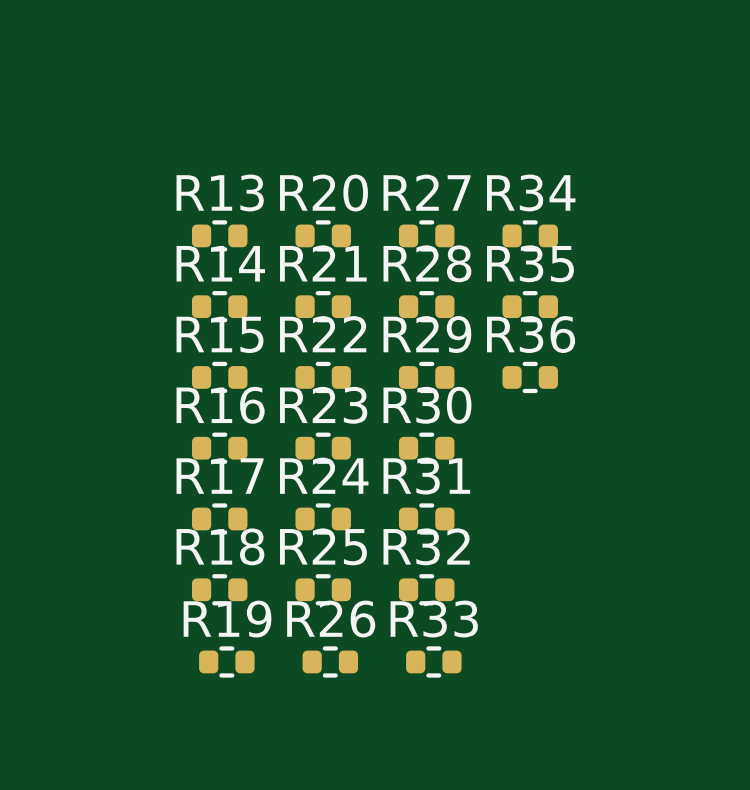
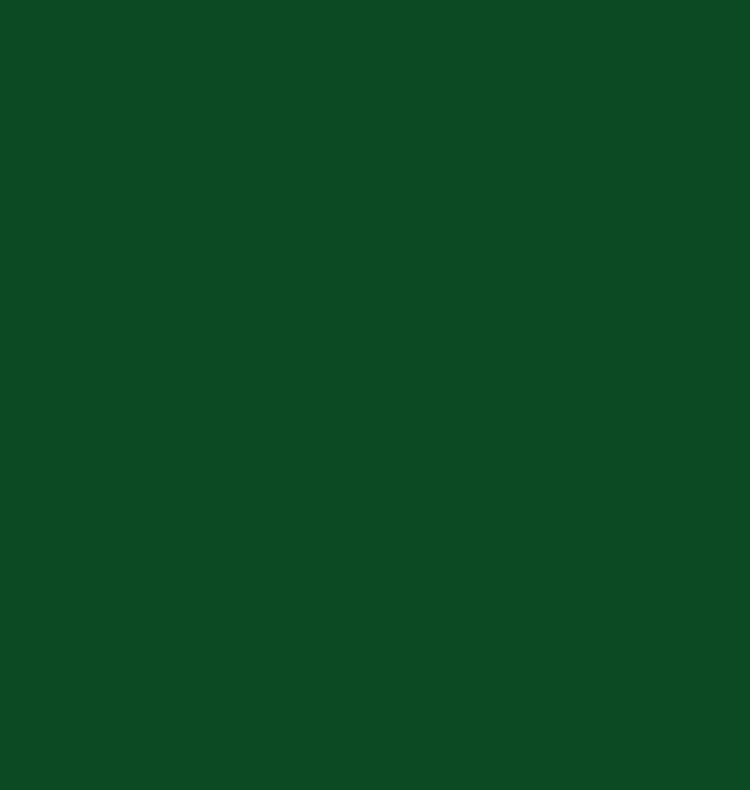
R13: (219, 235) -> none
R20: (323, 235) -> none
R27: (426, 235) -> none
R34: (530, 235) -> none
R14: (219, 306) -> none
R21: (323, 306) -> none
R28: (426, 306) -> none
R35: (530, 306) -> none
R15: (219, 377) -> none
R22: (323, 377) -> none
R29: (426, 377) -> none
R36: (530, 377) -> none
R16: (219, 448) -> none
R23: (323, 448) -> none
R30: (426, 448) -> none
R17: (219, 519) -> none
R24: (323, 519) -> none
R31: (426, 519) -> none
R18: (219, 589) -> none
R25: (323, 589) -> none
R32: (426, 589) -> none
R19: (226, 661) -> none
R26: (330, 661) -> none
R33: (433, 661) -> none

